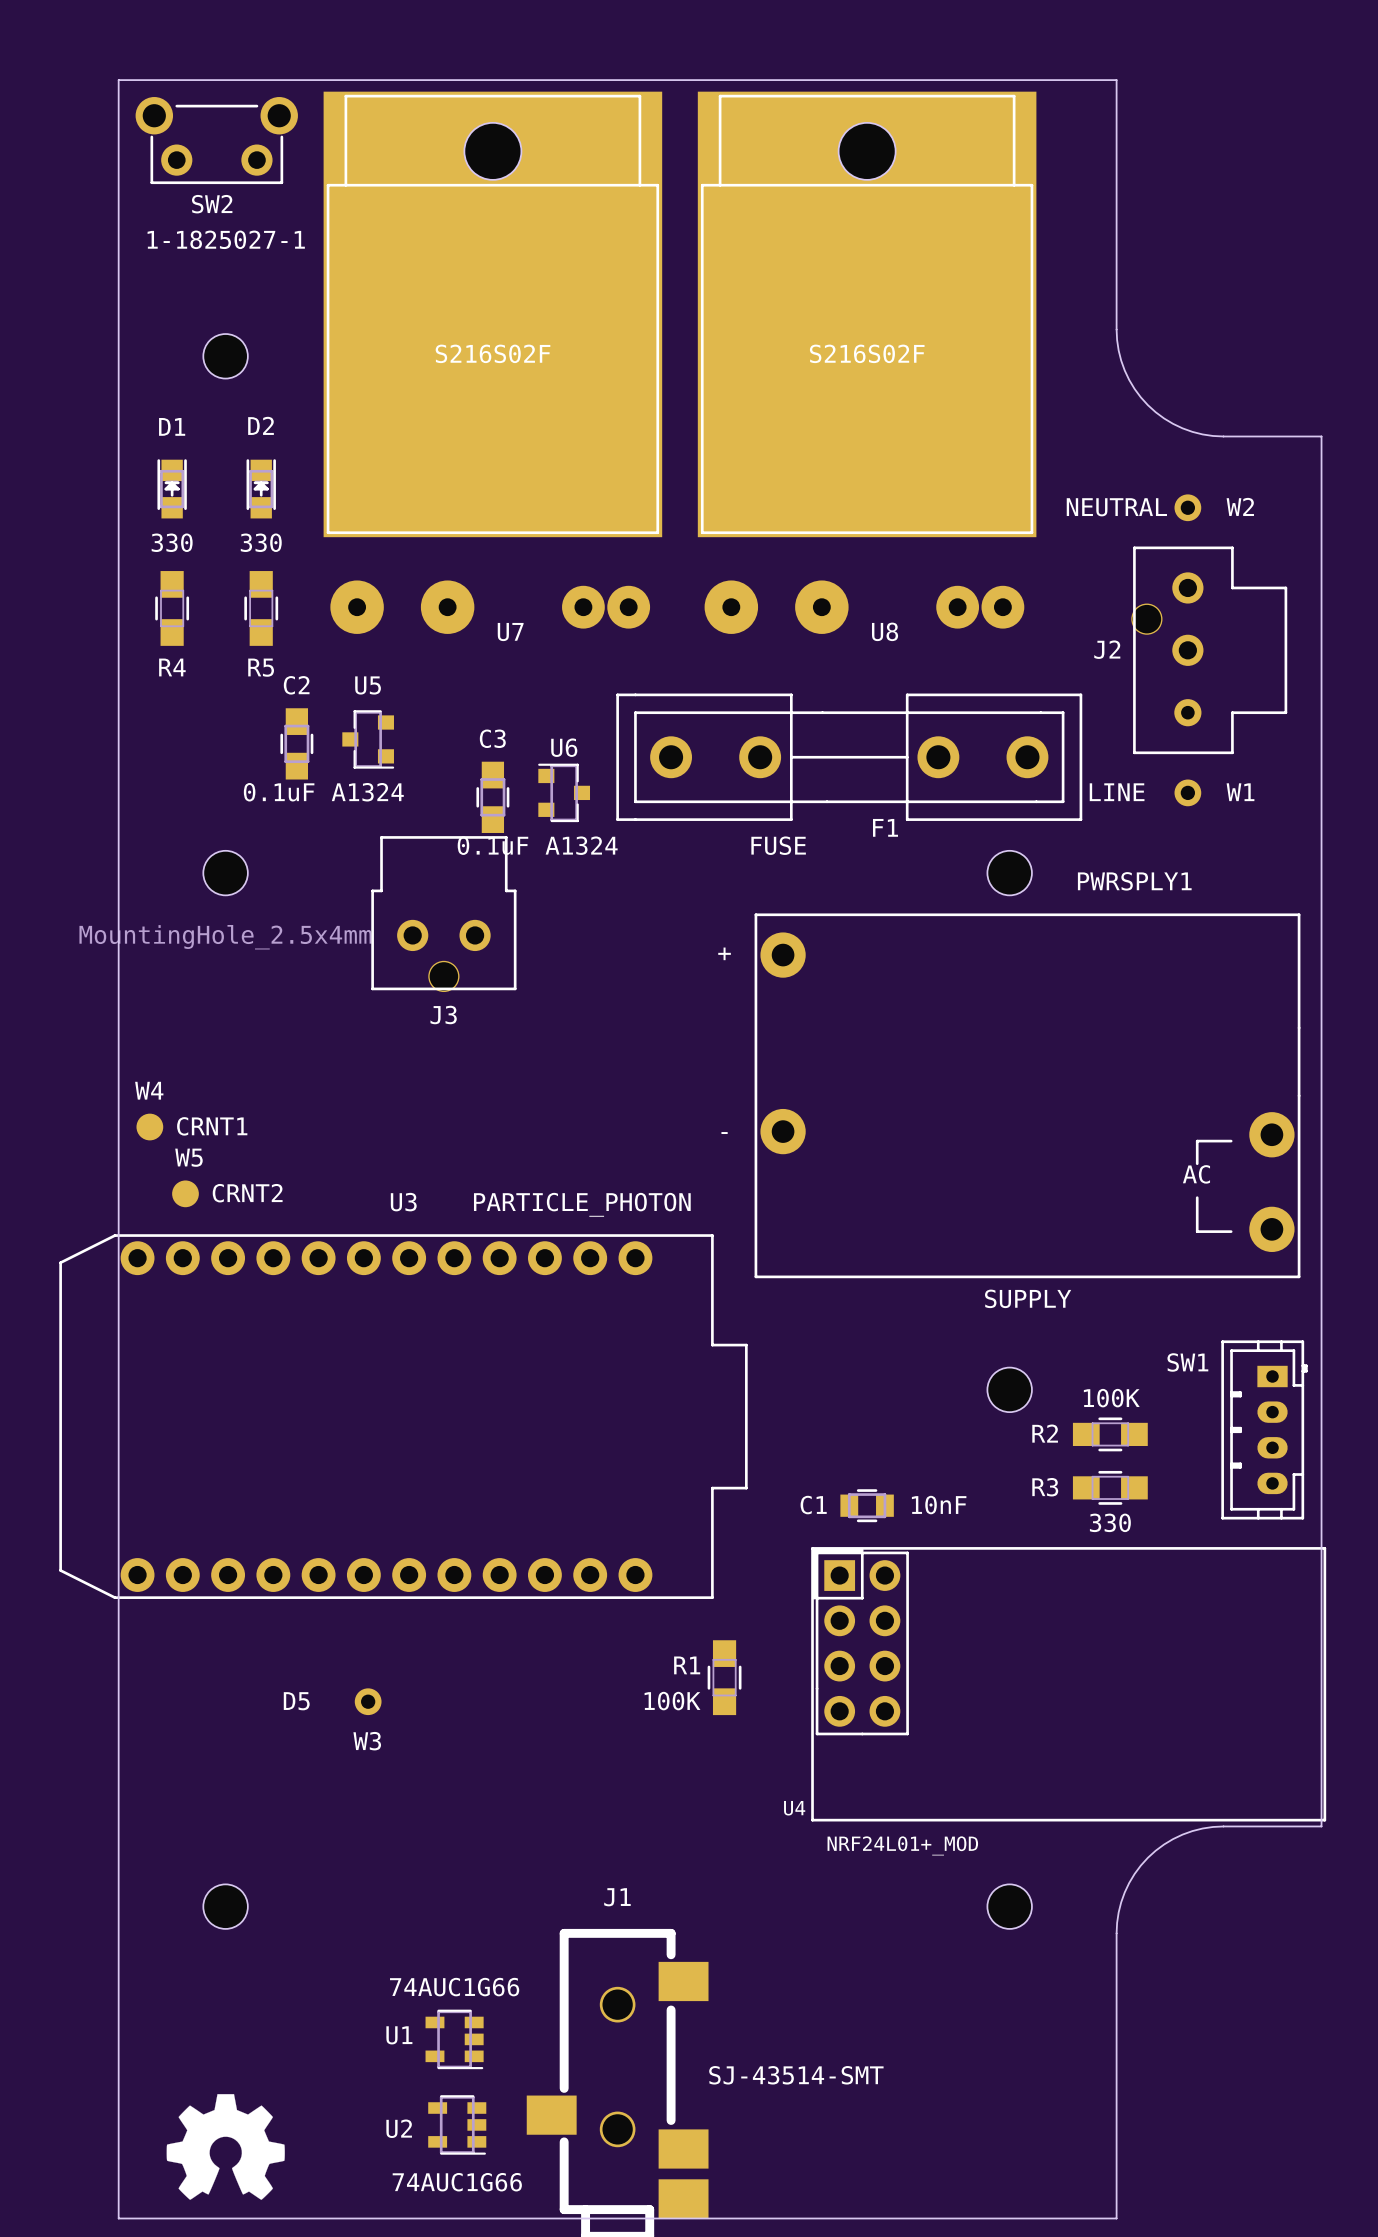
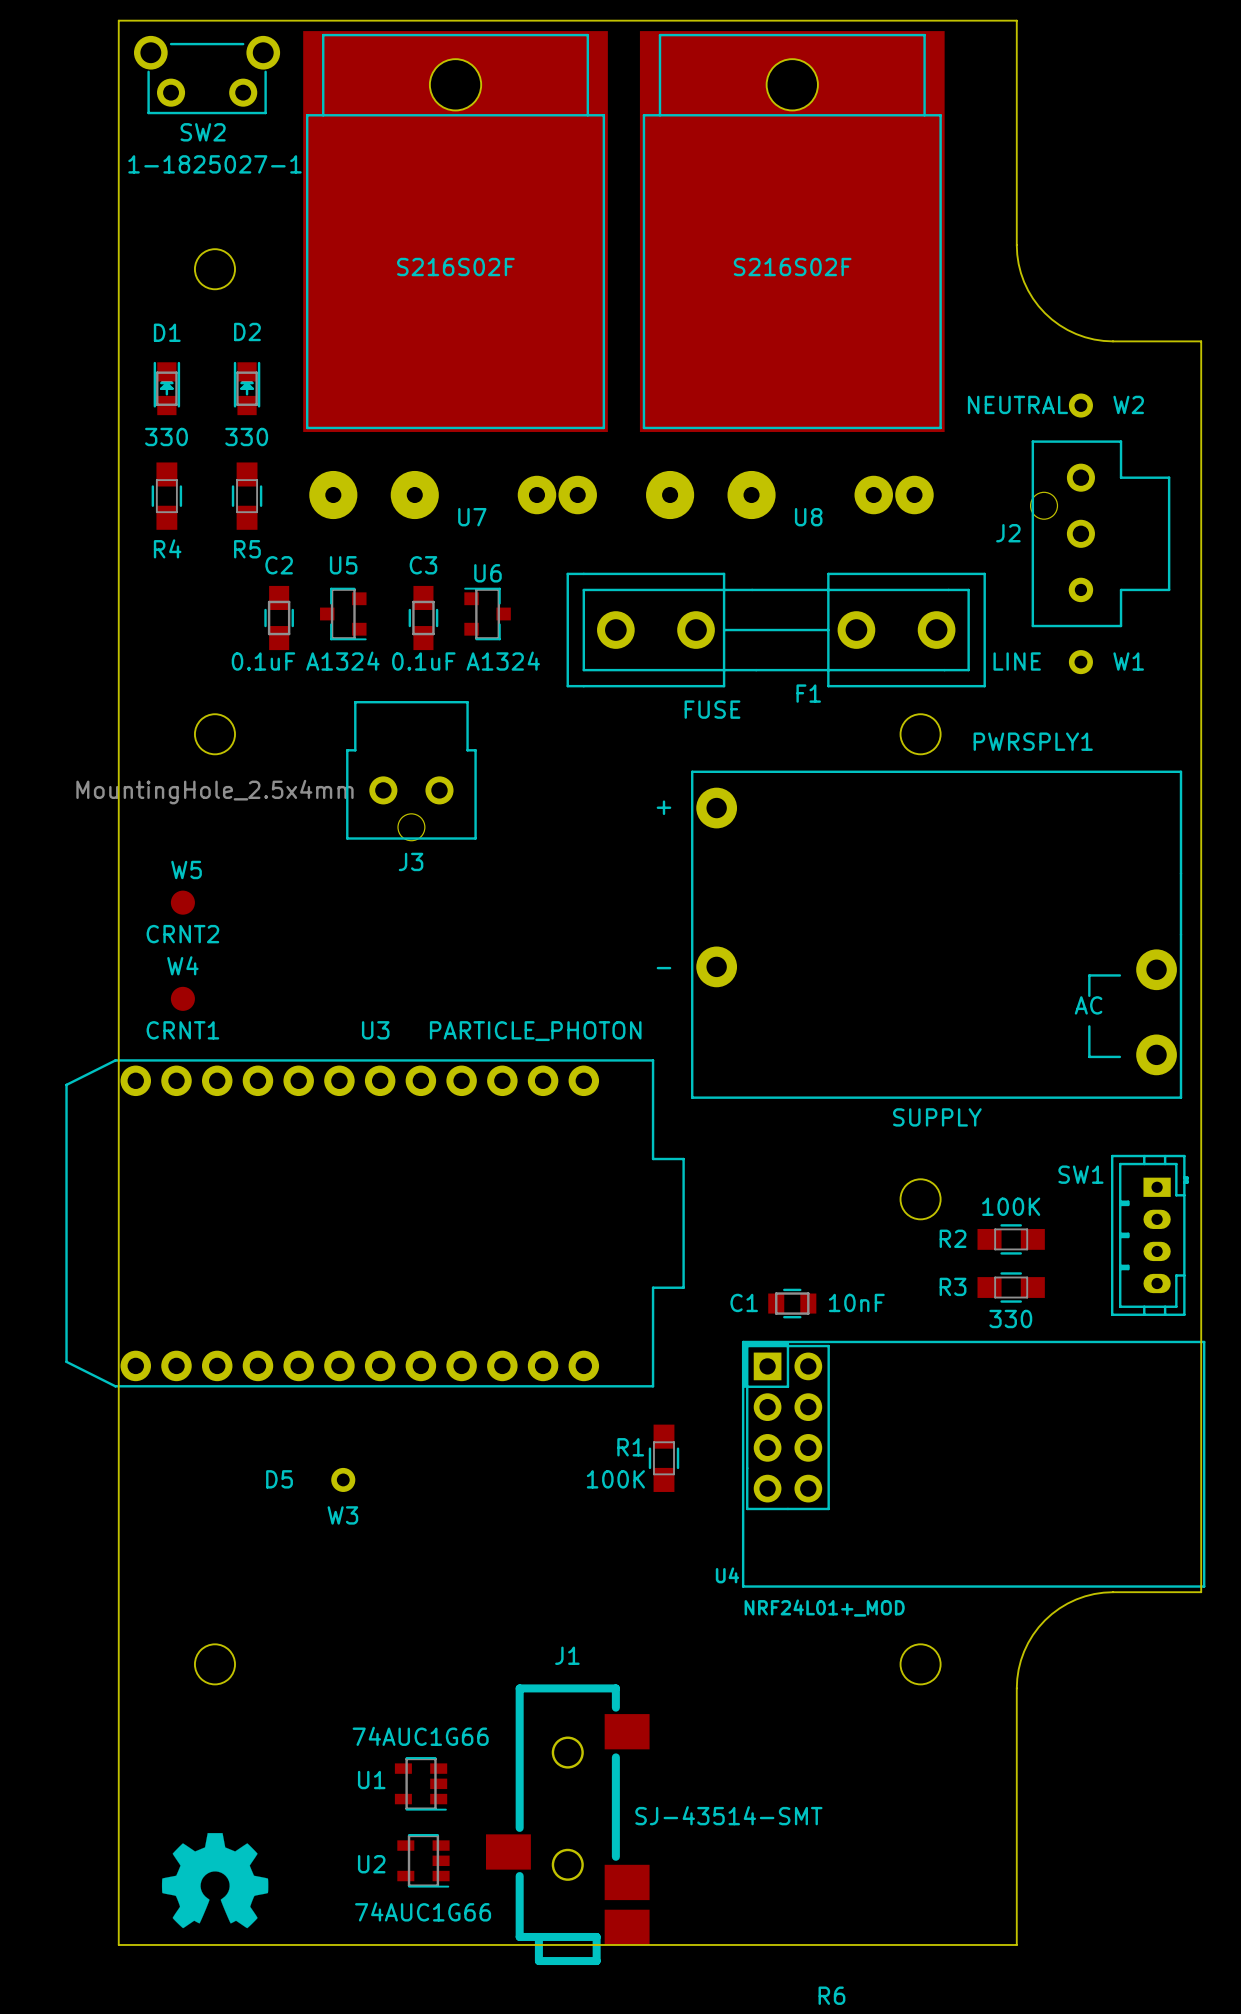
U6 position: (564, 792) -> (487, 614)
C3 position: (492, 797) -> (423, 618)
W4 value position: CRNT1 (212, 1126) -> CRNT1 (182, 1030)
W4 position: (149, 1127) -> (182, 998)
W5 position: (185, 1193) -> (182, 902)
W5 value position: CRNT2 (247, 1193) -> CRNT2 (182, 934)

